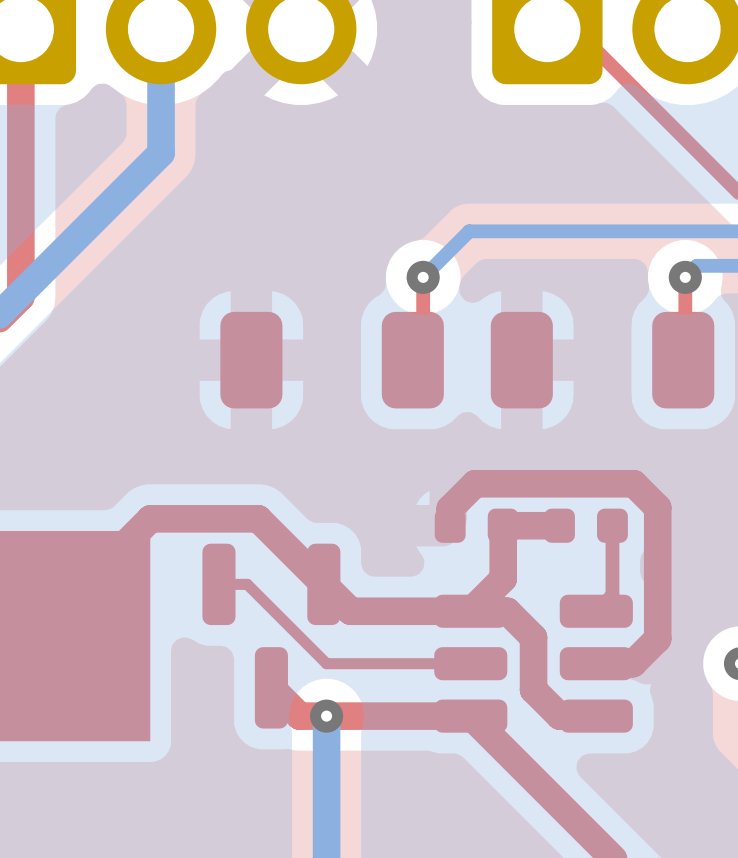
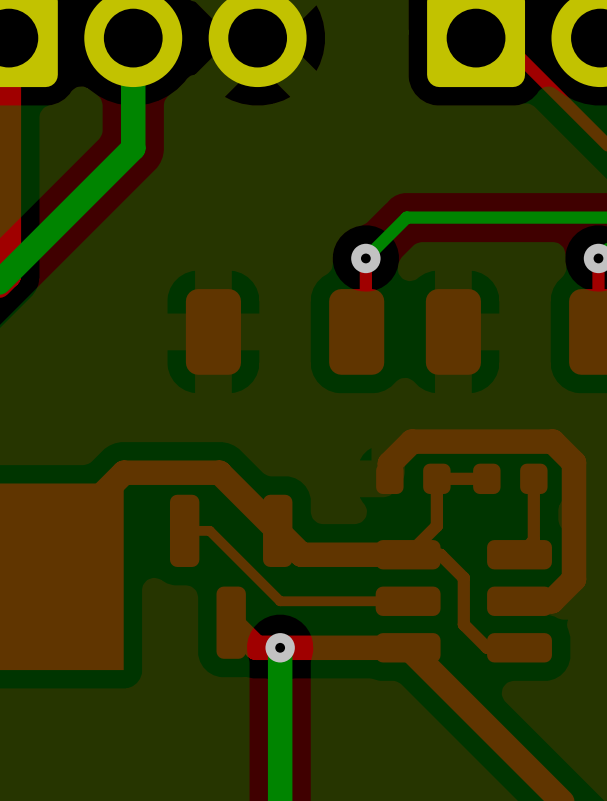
top track width: thick (559, 525) (503, 525) (503, 578) (470, 611) (507, 611) (533, 637) (533, 689) (559, 716) (596, 716) -> thin (486, 478) (436, 478) (436, 525) (408, 554) (440, 554) (463, 578) (463, 624) (487, 647) (519, 647)

